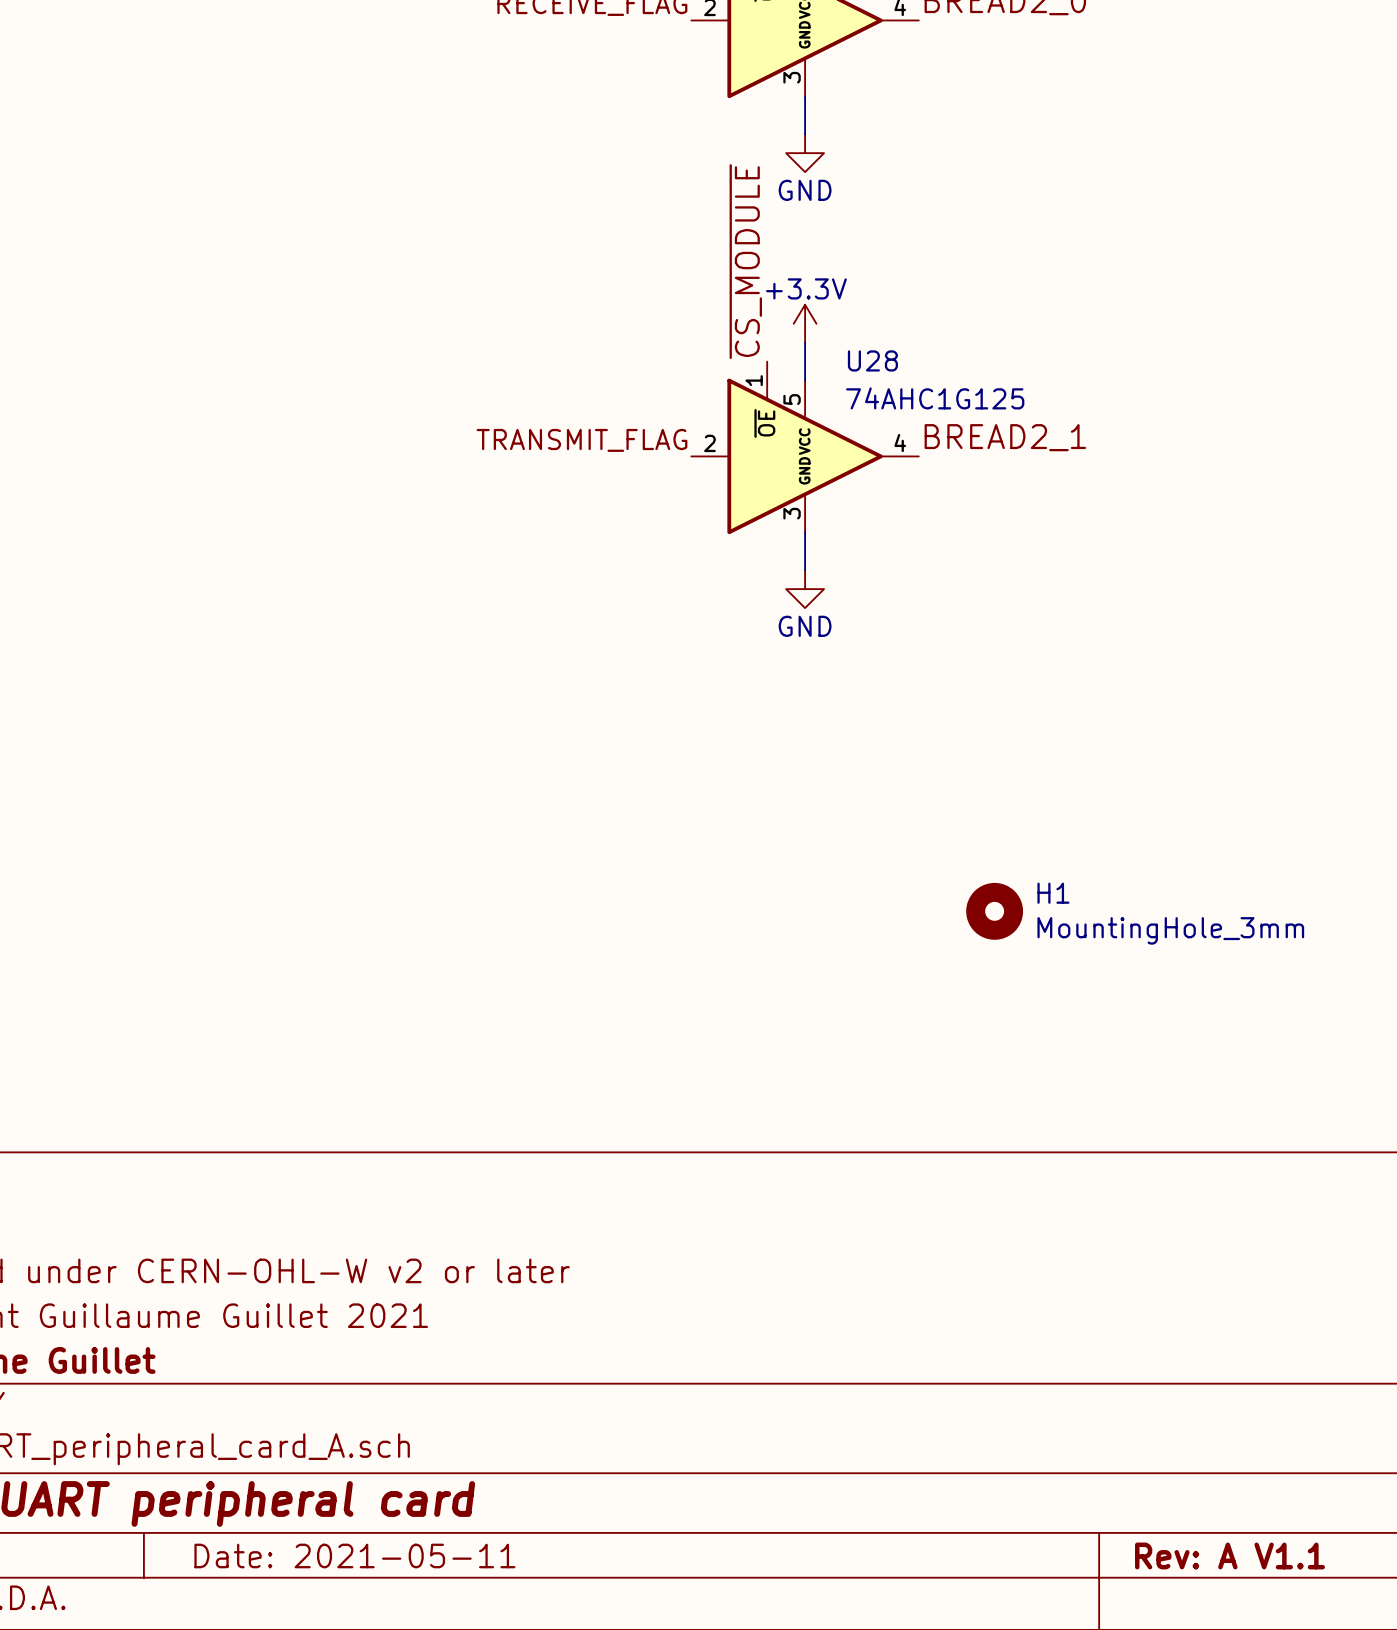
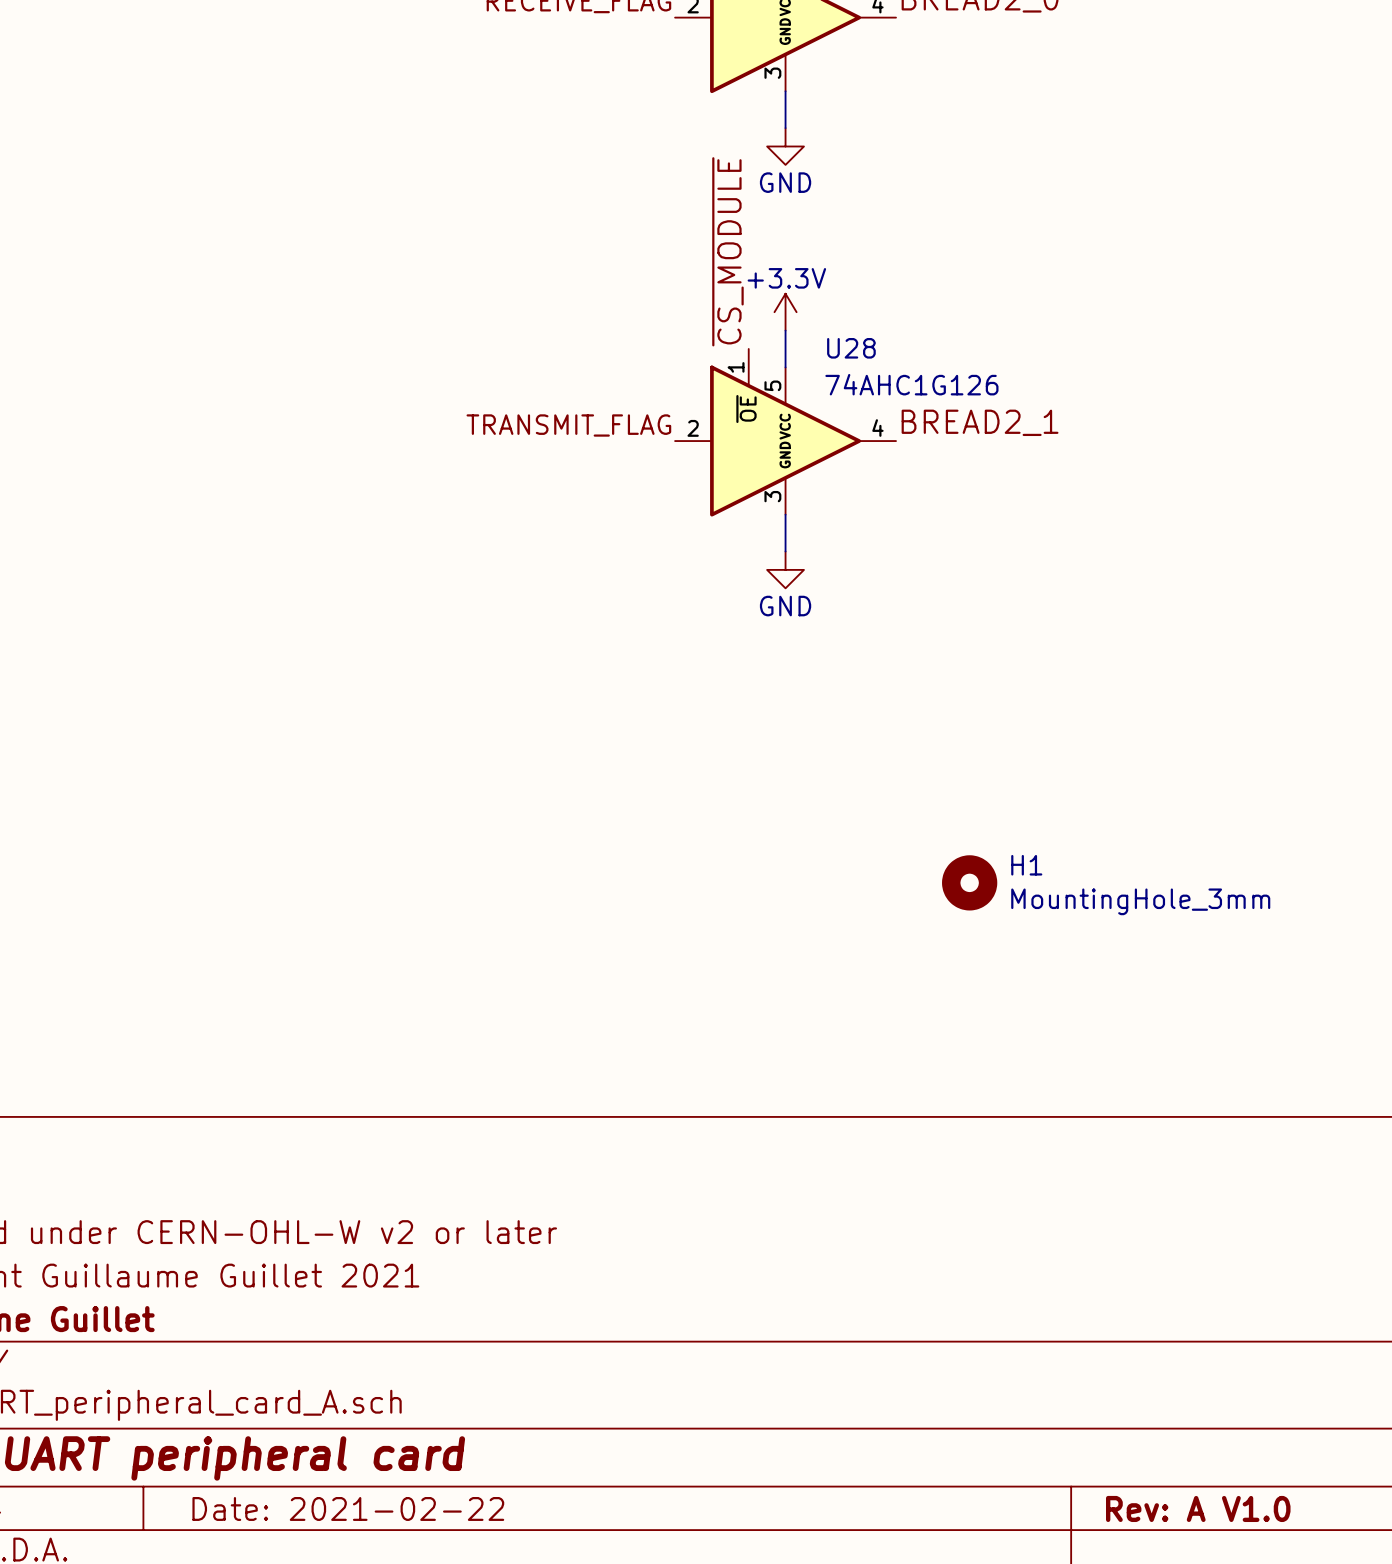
U28 value: 74AHC1G125 (935, 398) -> 74AHC1G126 (911, 384)
title block: Date: 2021-05-11 (354, 1555) -> Date: 2021-02-22 (348, 1508)
title block: Rev: A V1.1 (1230, 1555) -> Rev: A V1.0 (1198, 1508)

